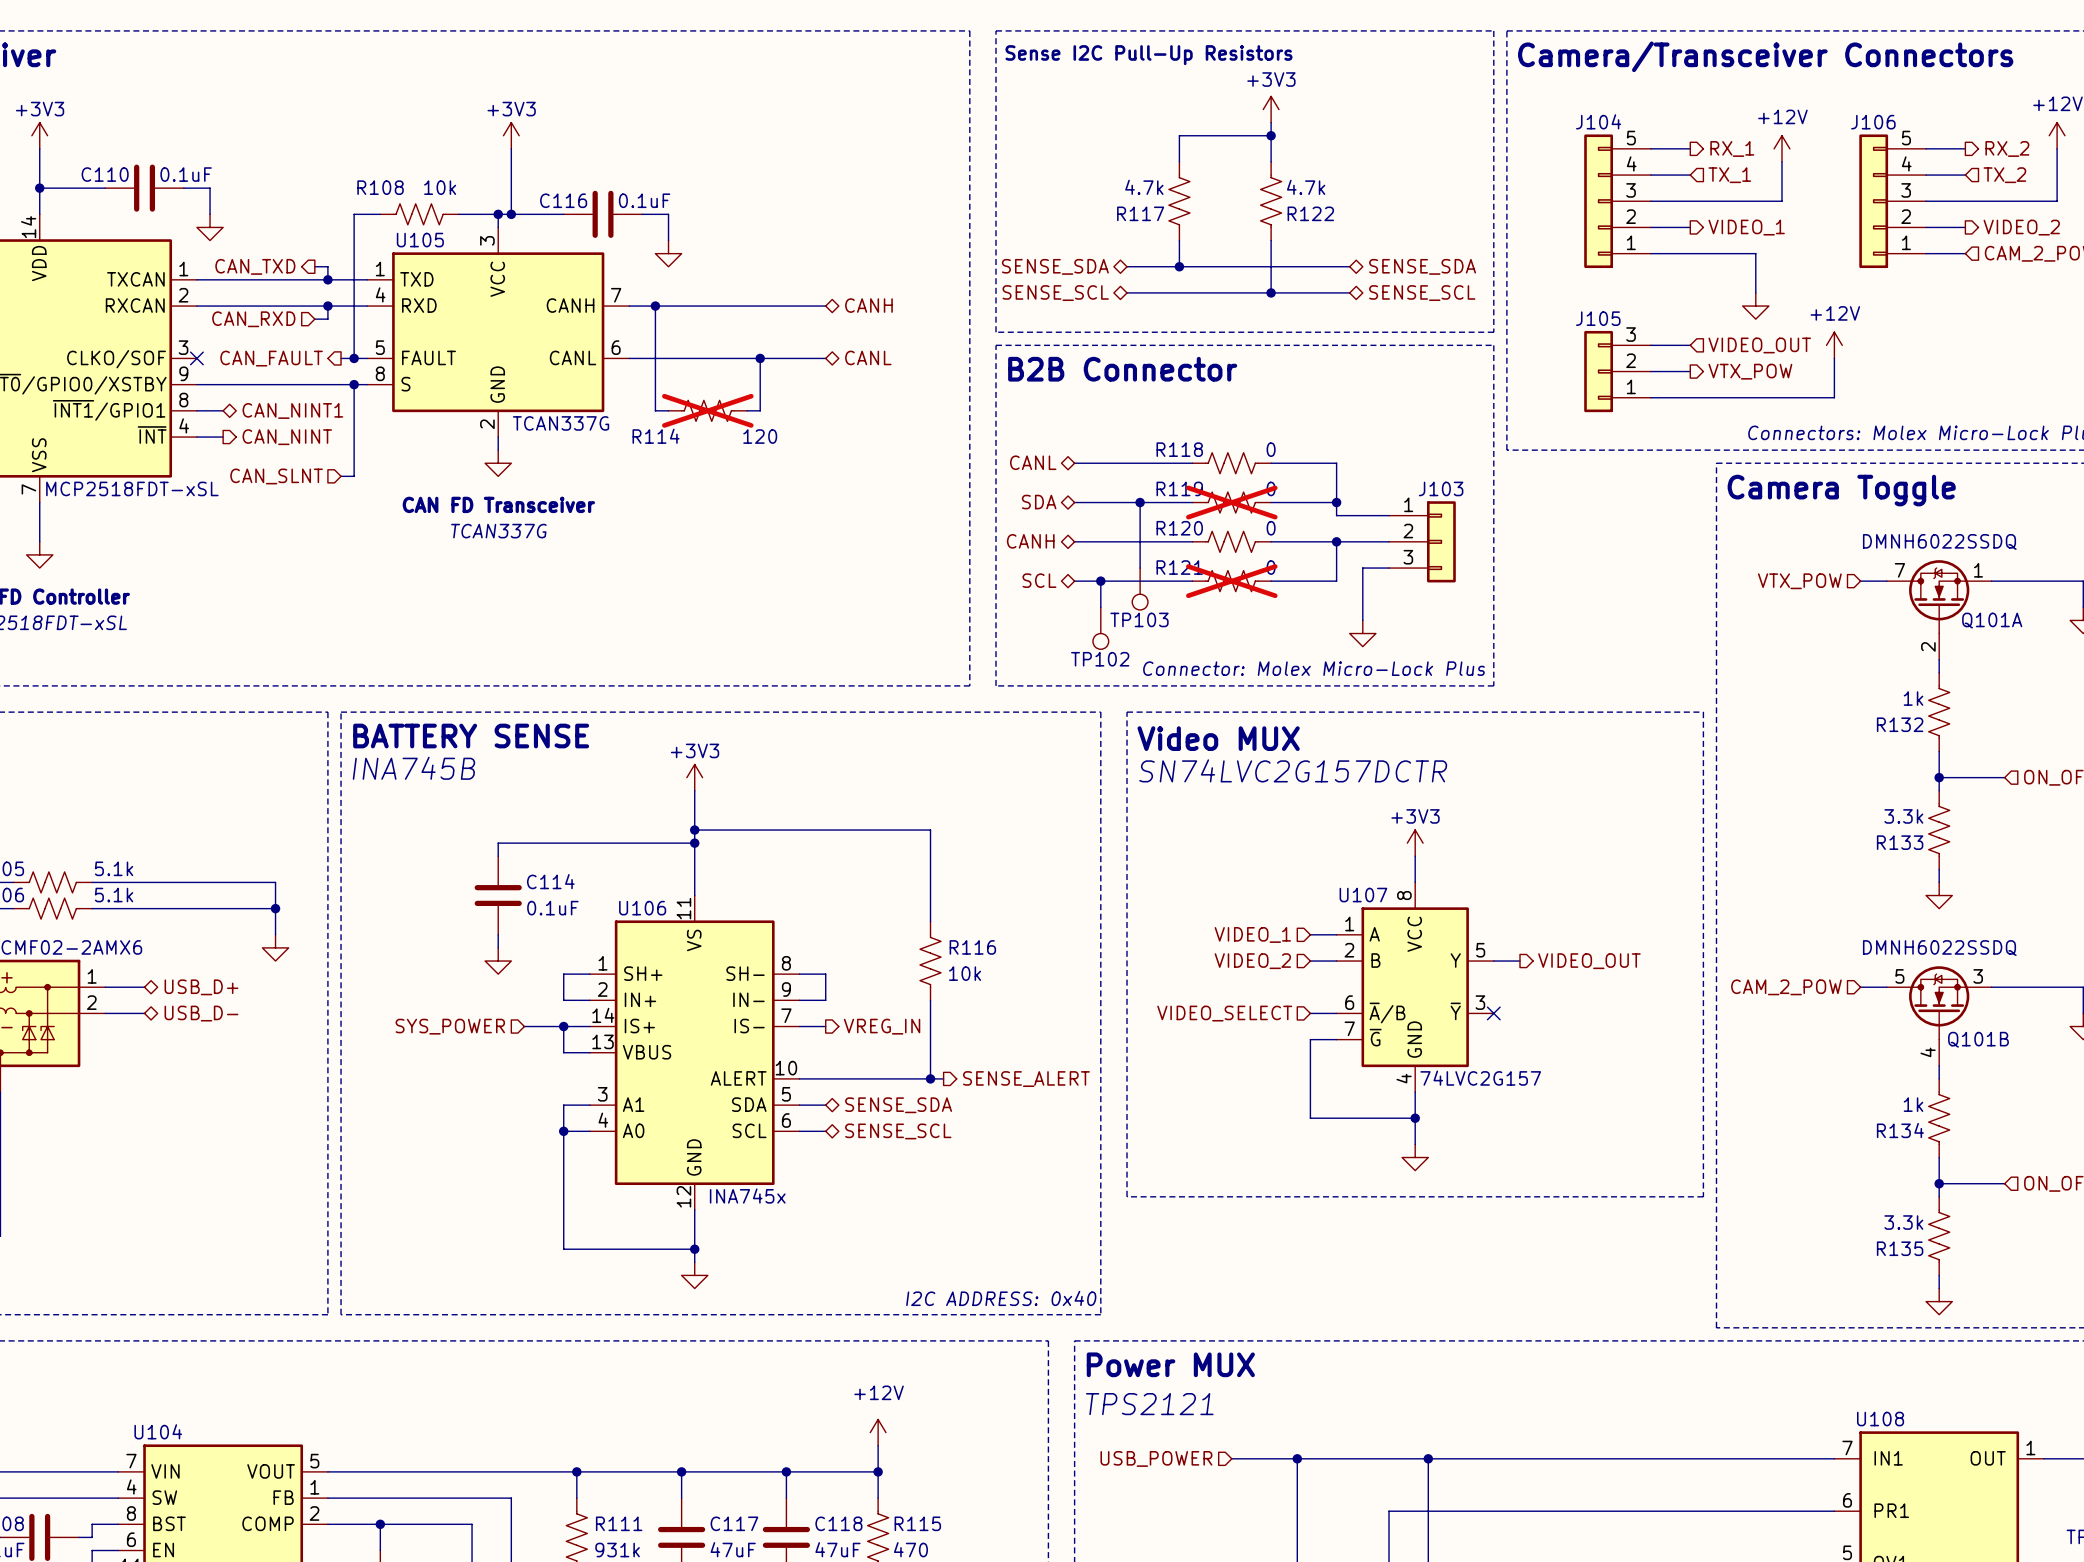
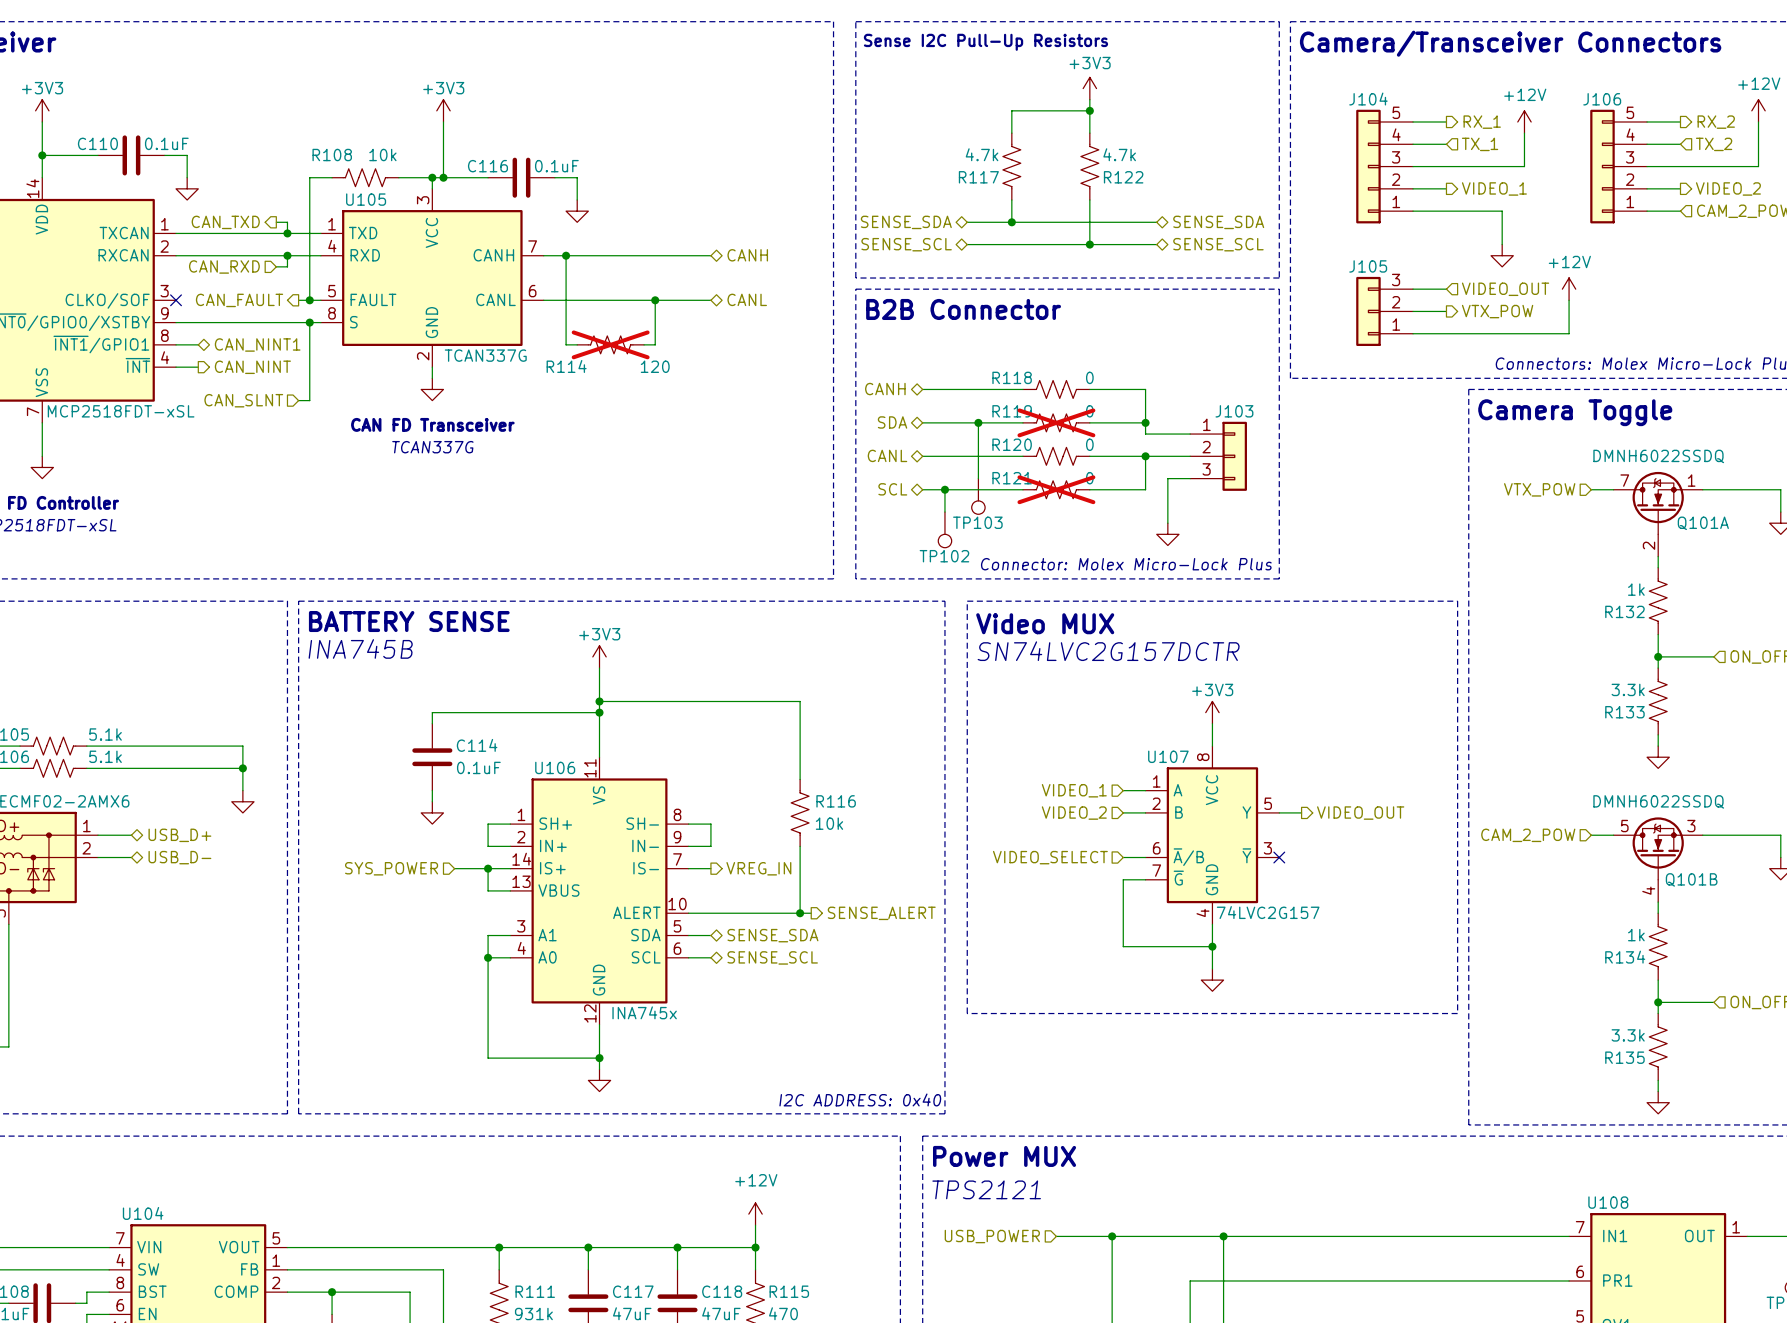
hierarchical label: CANL (1033, 462) -> CANH (885, 389)
hierarchical label: CANH (1030, 541) -> CANL (887, 455)

